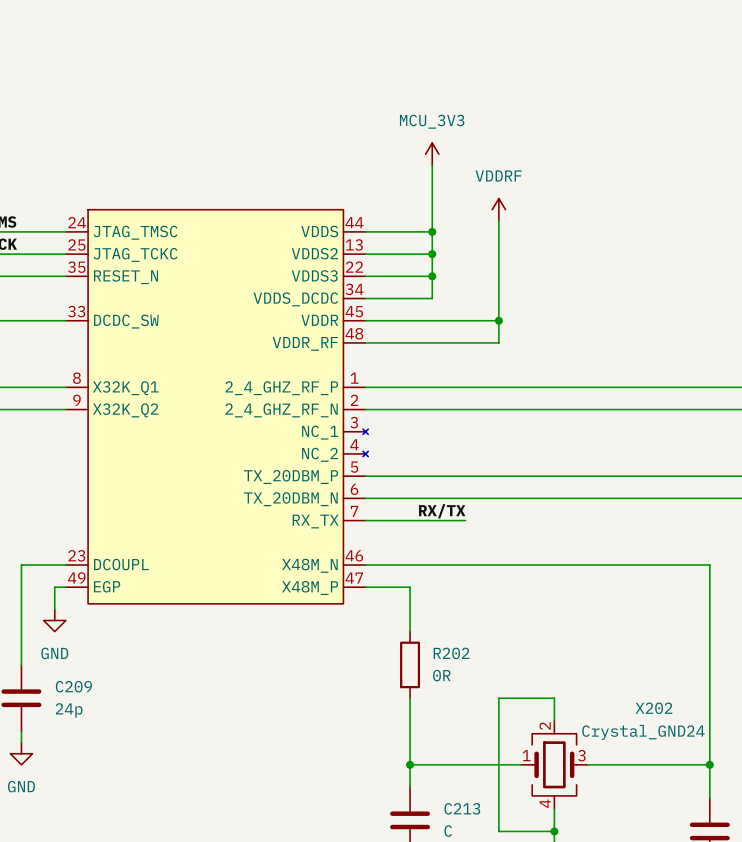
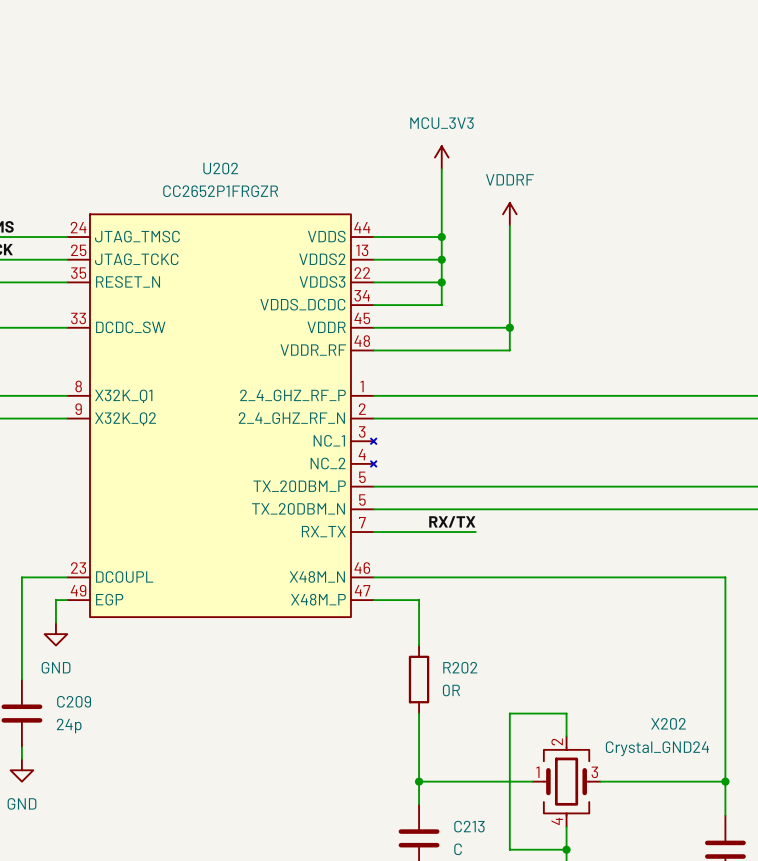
U202 name: none -> U202 (220, 168)
U202 value: none -> CC2652P1FRGZR (220, 191)
U202 pin number: 6 (354, 489) -> 5 (362, 500)

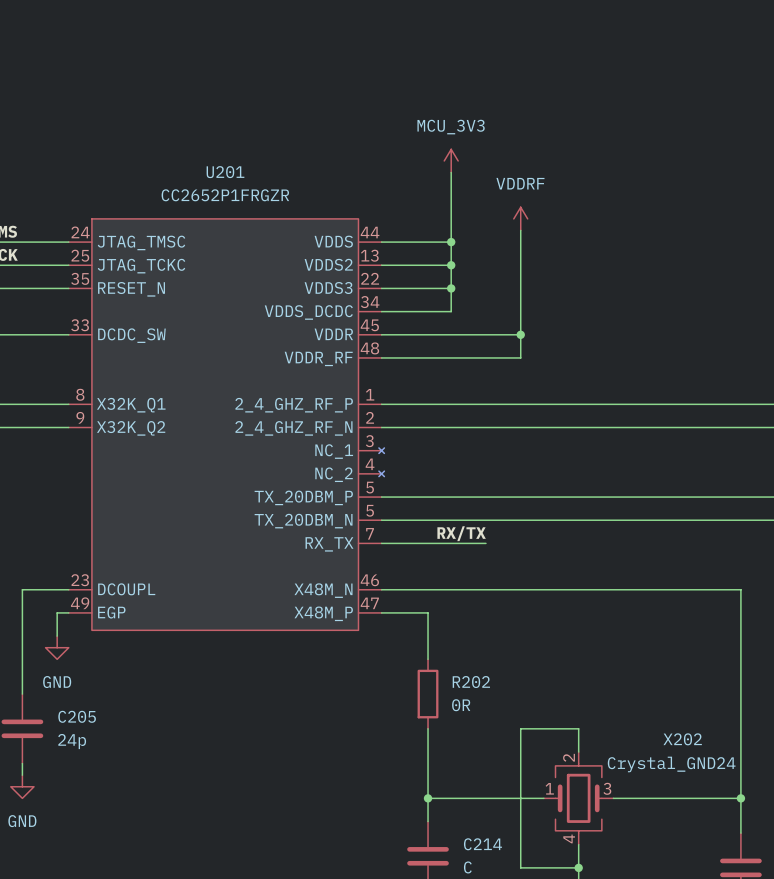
U202 name: U202 (220, 168) -> U201 (225, 172)
C209 name: C209 (74, 701) -> C205 (77, 716)
C213 name: C213 (469, 826) -> C214 (482, 844)

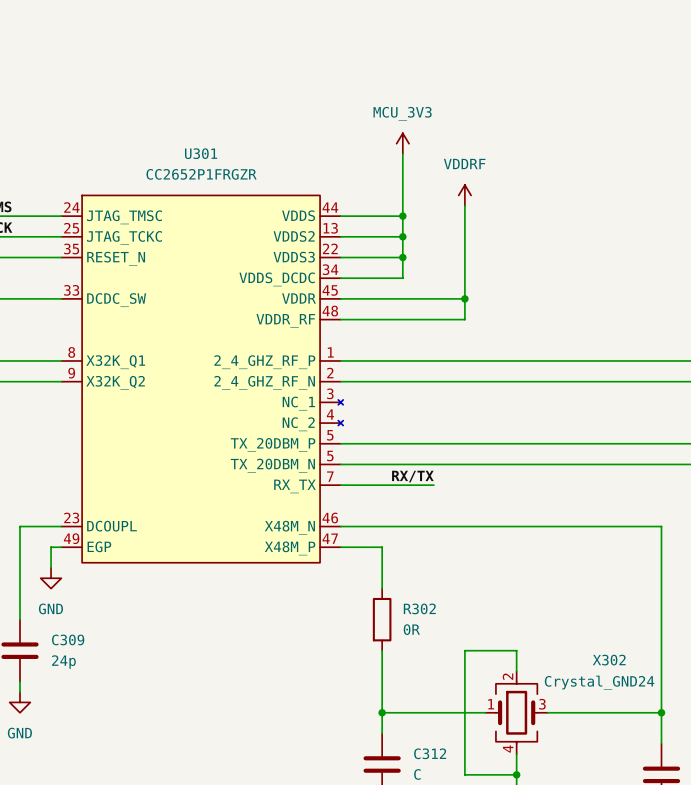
U201 name: U201 (225, 172) -> U301 (201, 153)
R202 name: R202 (471, 682) -> R302 (419, 608)
C205 name: C205 (77, 716) -> C309 (68, 639)
X202 name: X202 (682, 739) -> X302 (609, 660)
C214 name: C214 (482, 844) -> C312 (430, 753)

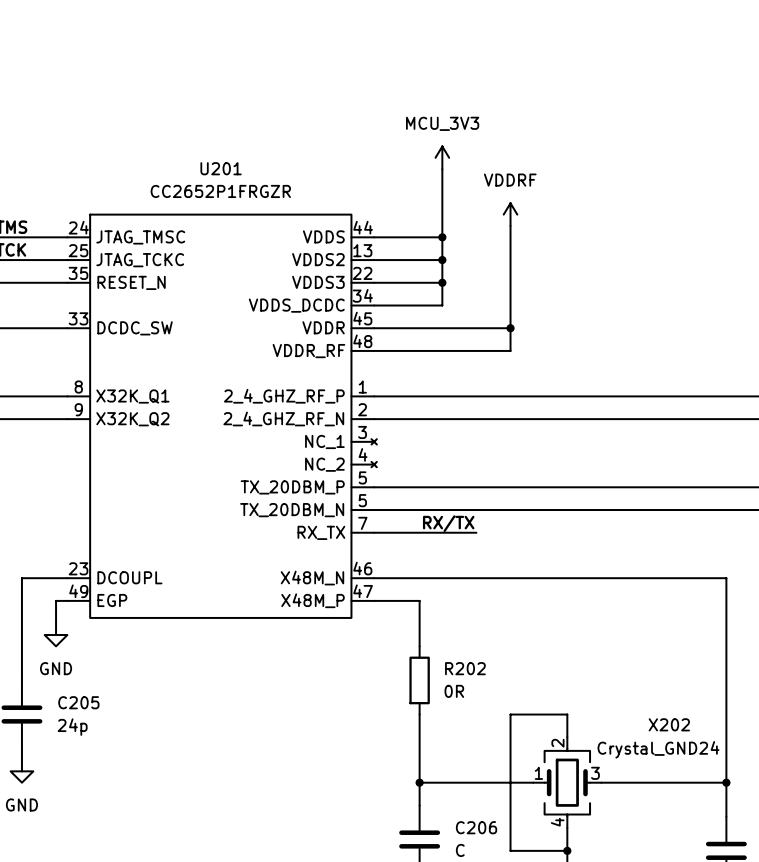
U301 name: U301 (201, 153) -> U201 (221, 168)
R302 name: R302 (419, 608) -> R202 (465, 668)
C309 name: C309 (68, 639) -> C205 (78, 702)
X302 name: X302 (609, 660) -> X202 (669, 724)
C312 name: C312 (430, 753) -> C206 (476, 827)

